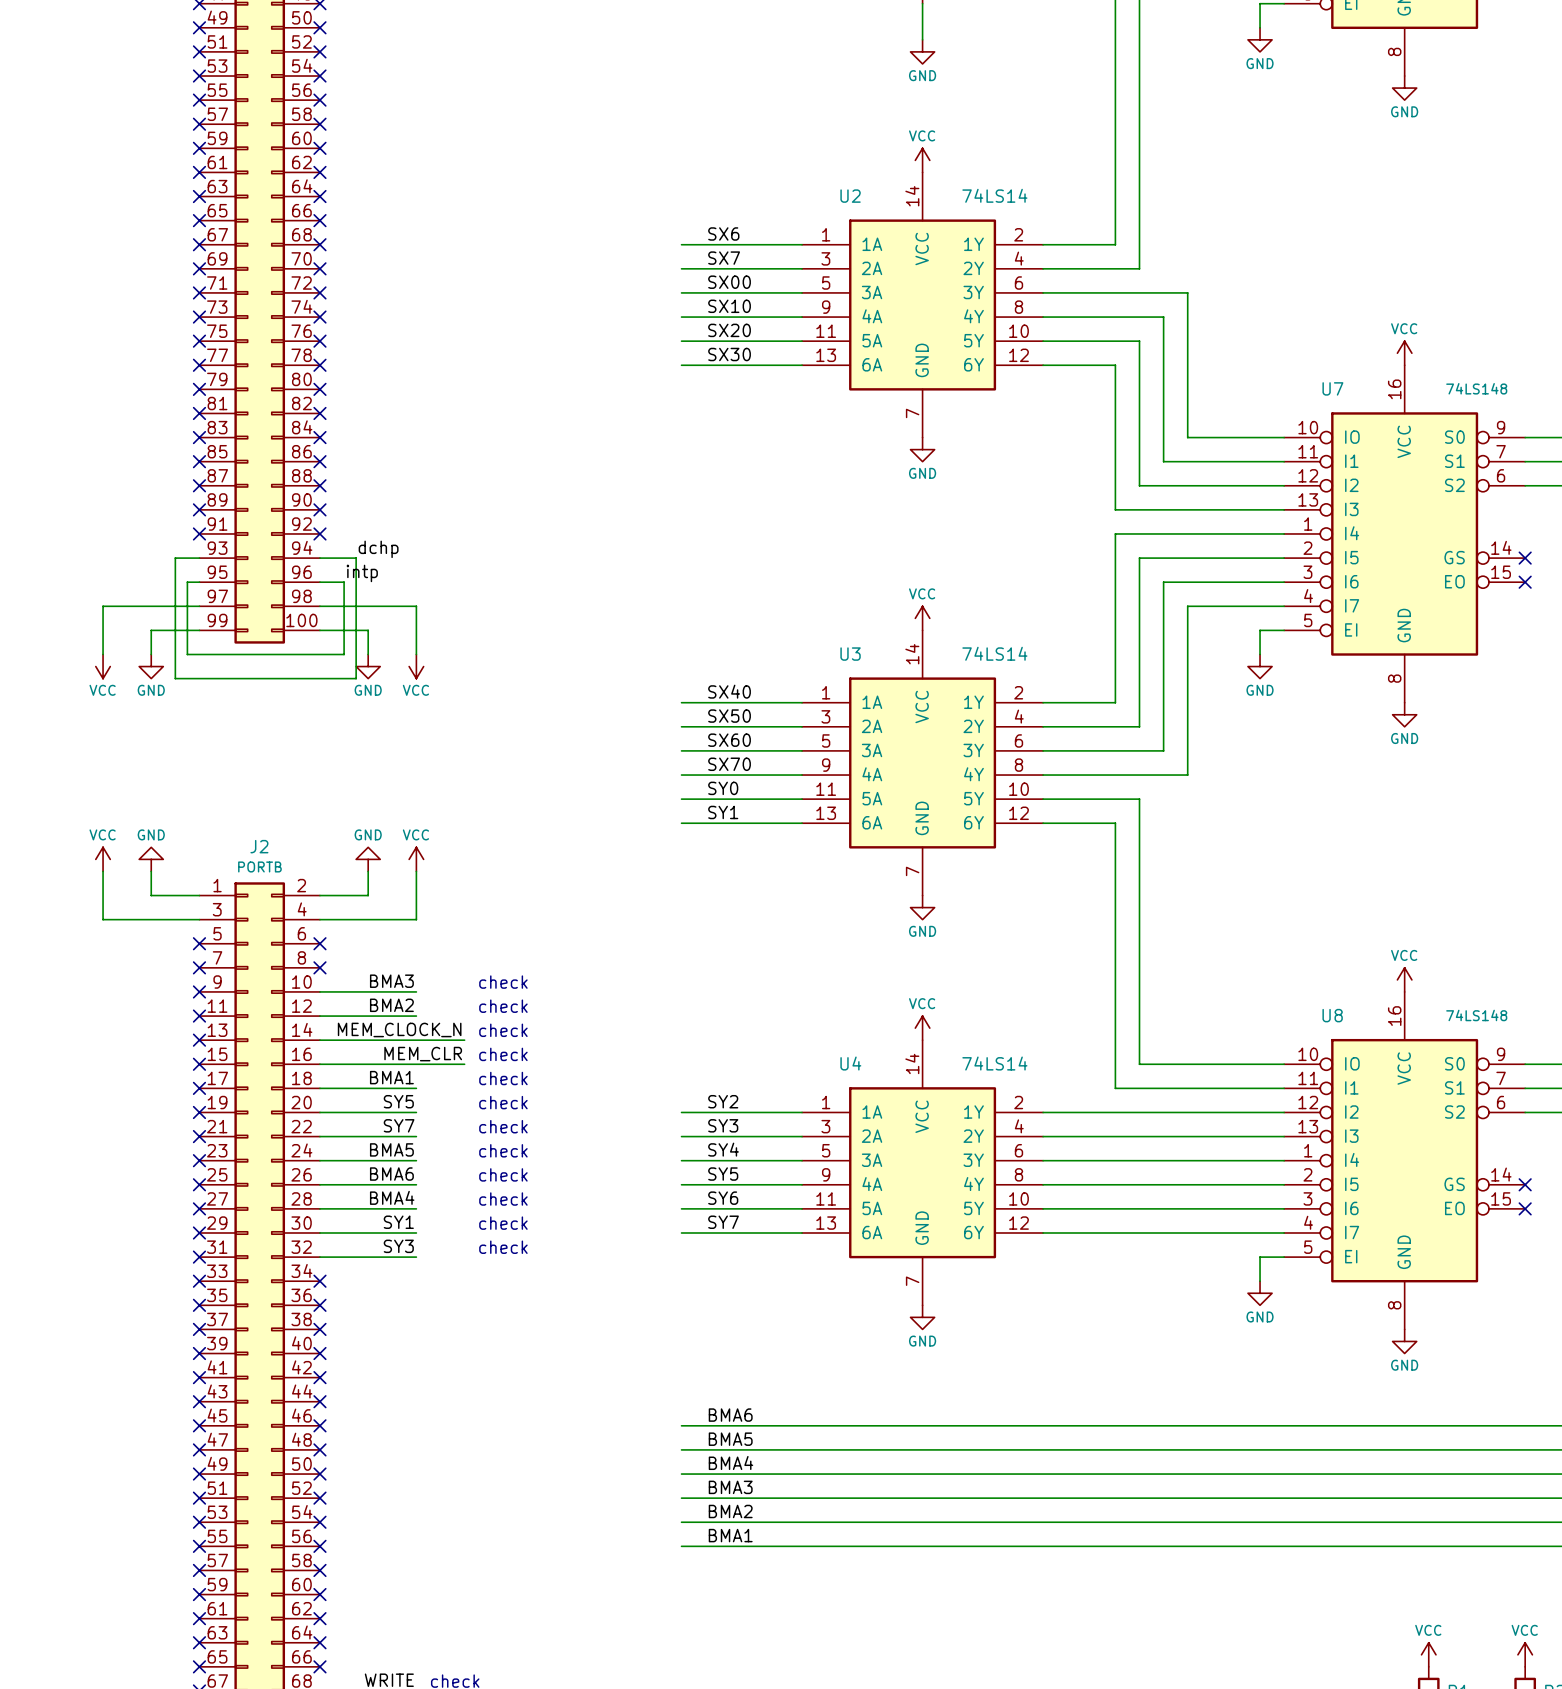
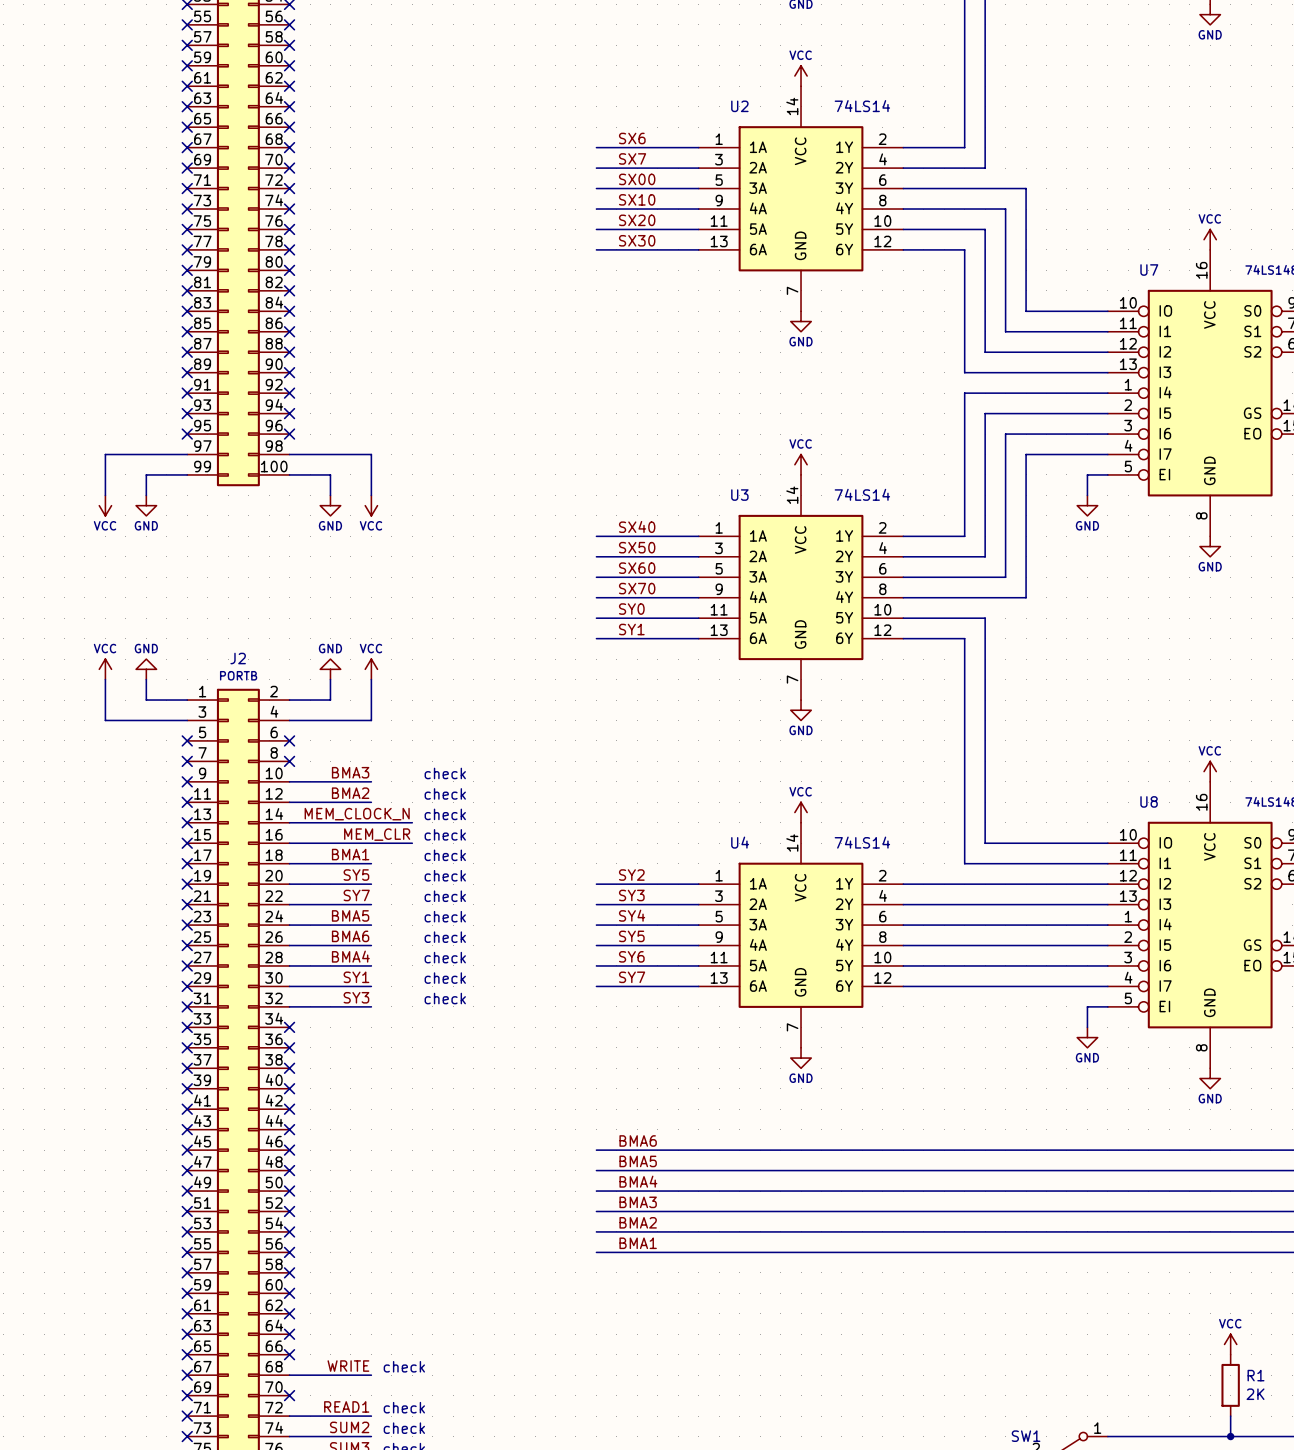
label: dchp (378, 549) -> none
wire: (199, 558) (175, 558) (175, 678) (356, 678) (356, 558) (319, 558) -> none
no-connect mark: none -> (187, 413)
no-connect mark: none -> (289, 413)
label: intp (362, 573) -> none
wire: (199, 582) (187, 582) (187, 654) (344, 654) (344, 582) (319, 582) -> none
no-connect mark: none -> (187, 434)
no-connect mark: none -> (289, 434)

